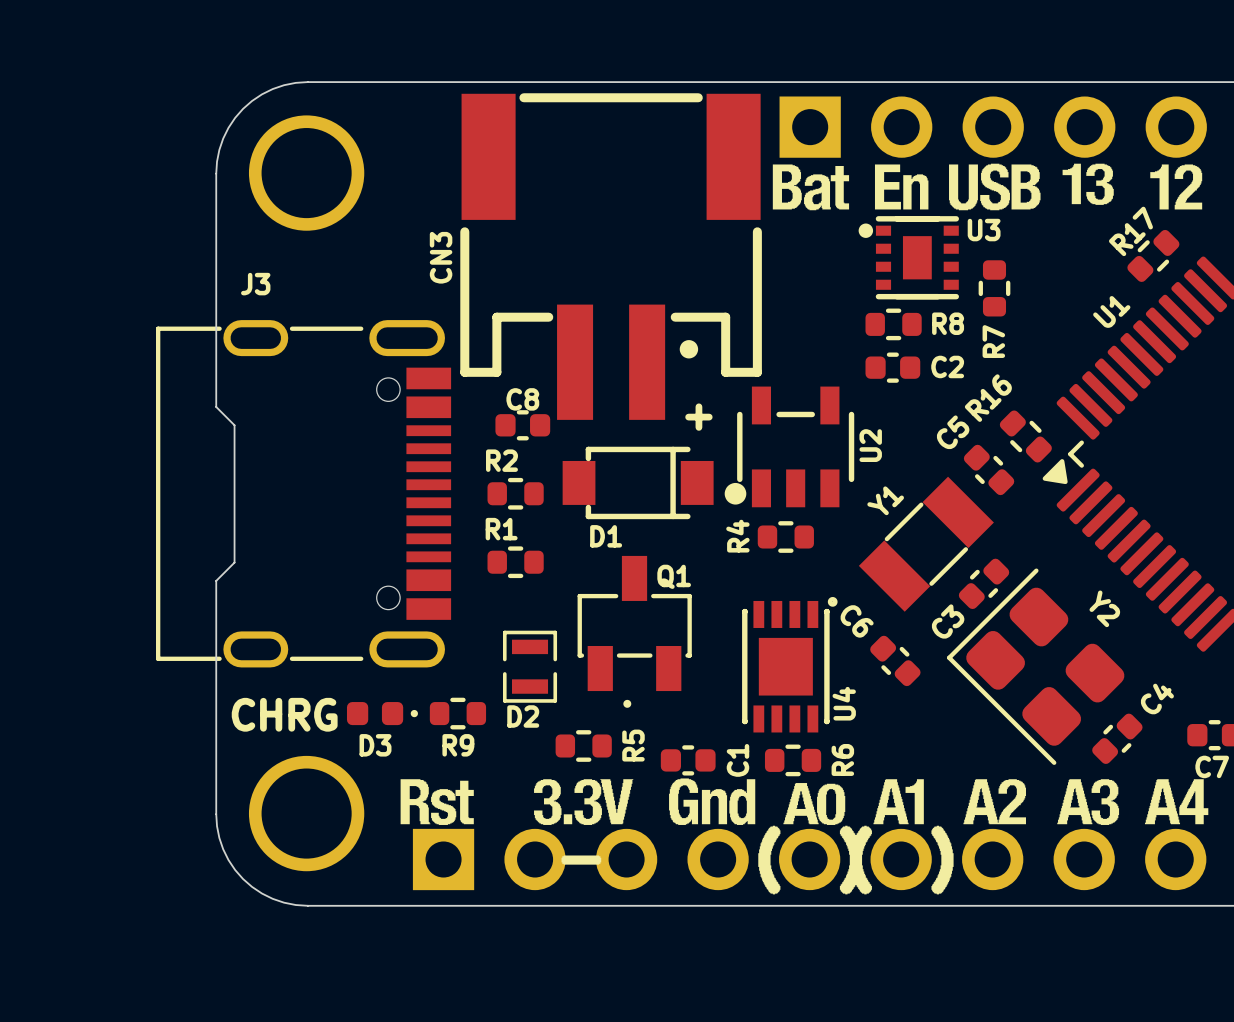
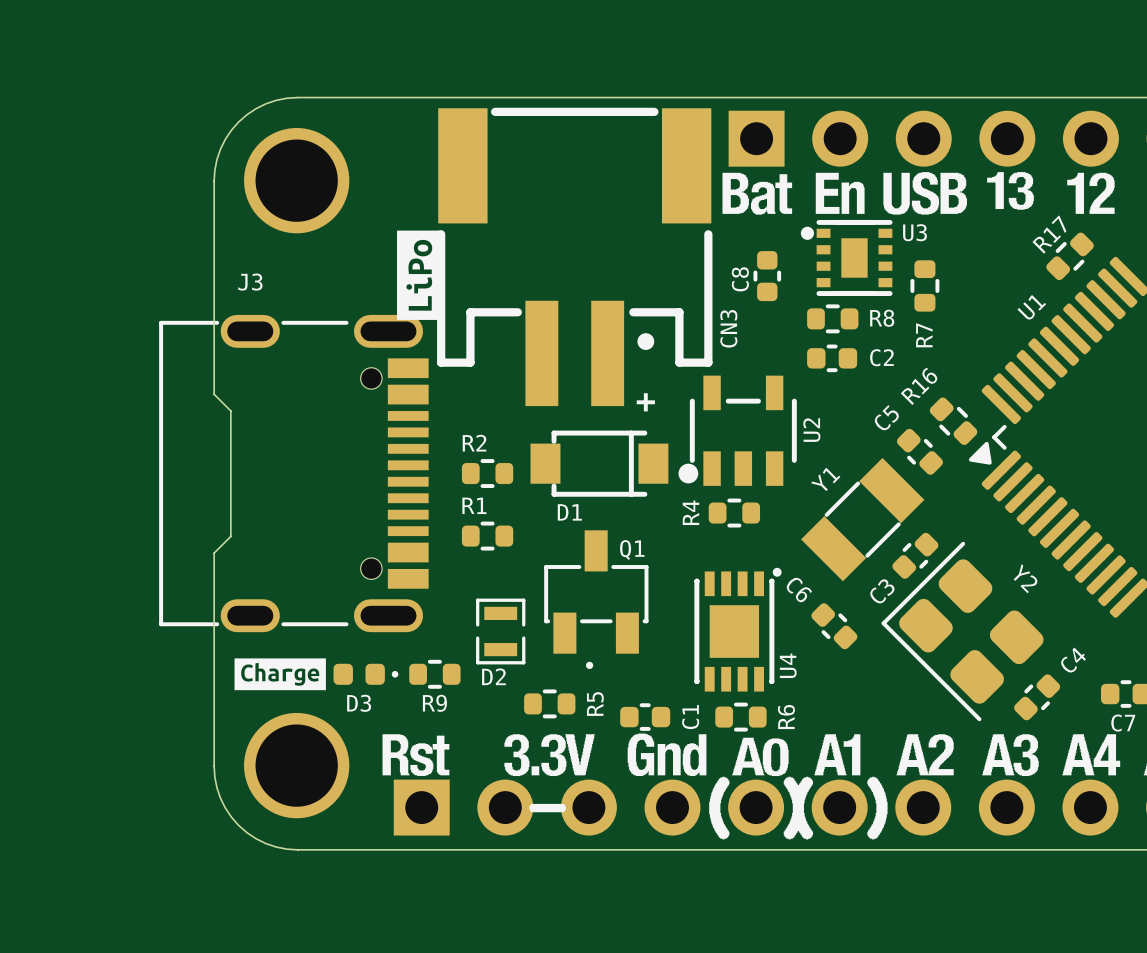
drawing: none -> [396, 230, 442, 320]
CN3 name position: CN3 (441, 257) -> CN3 (728, 328)
C8 rotation: 0° (522, 425) -> 90° clockwise (767, 276)
C8 position: (522, 425) -> (767, 276)
drawing: none -> [234, 658, 326, 691]
text: CHRG (284, 714) -> none

